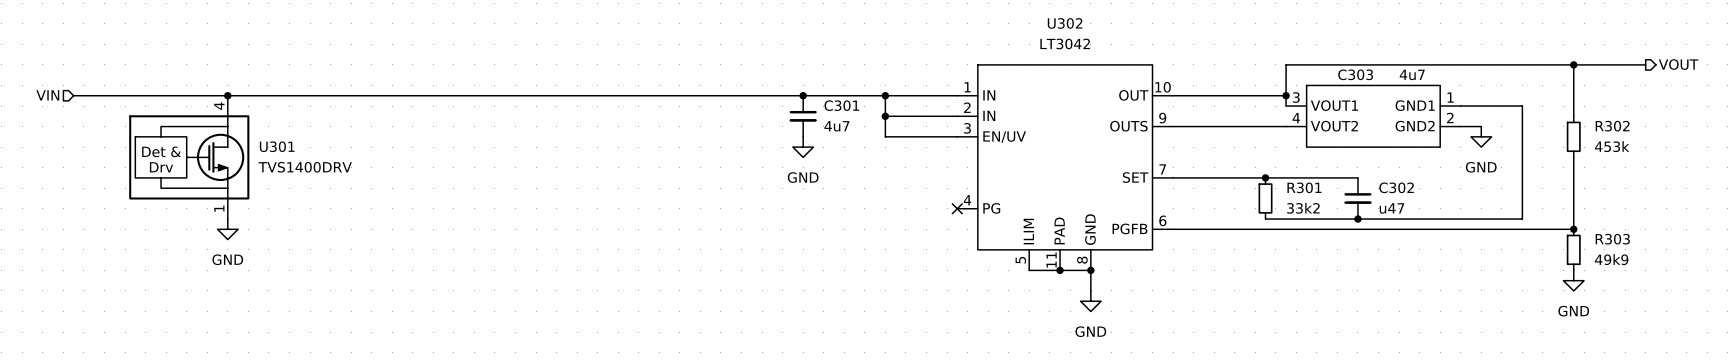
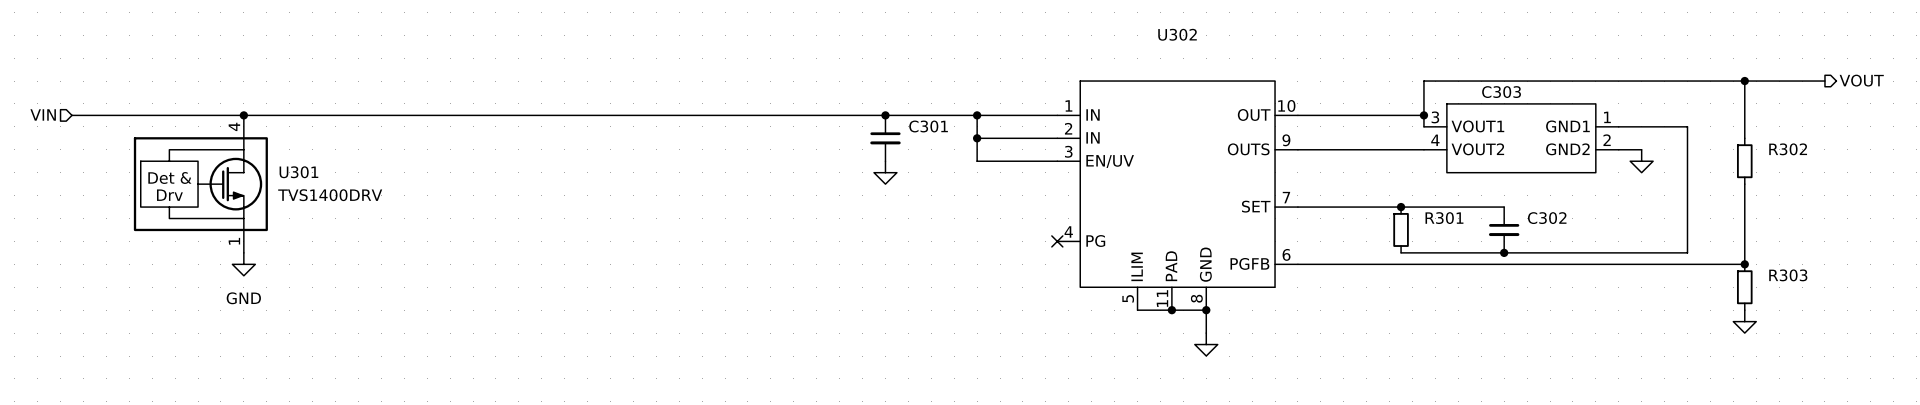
U302 value: LT3042 (1065, 43) -> none
C303 value: 4u7 (1412, 74) -> none
C301 value: 4u7 (836, 126) -> none
R302 value: 453k (1612, 146) -> none
power symbol text: GND (1481, 167) -> none
power symbol text: GND (803, 177) -> none
R301 value: 33k2 (1303, 208) -> none
C302 value: u47 (1391, 208) -> none
R303 value: 49k9 (1611, 259) -> none
power symbol text: GND (1573, 311) -> none
power symbol text: GND (1090, 331) -> none

